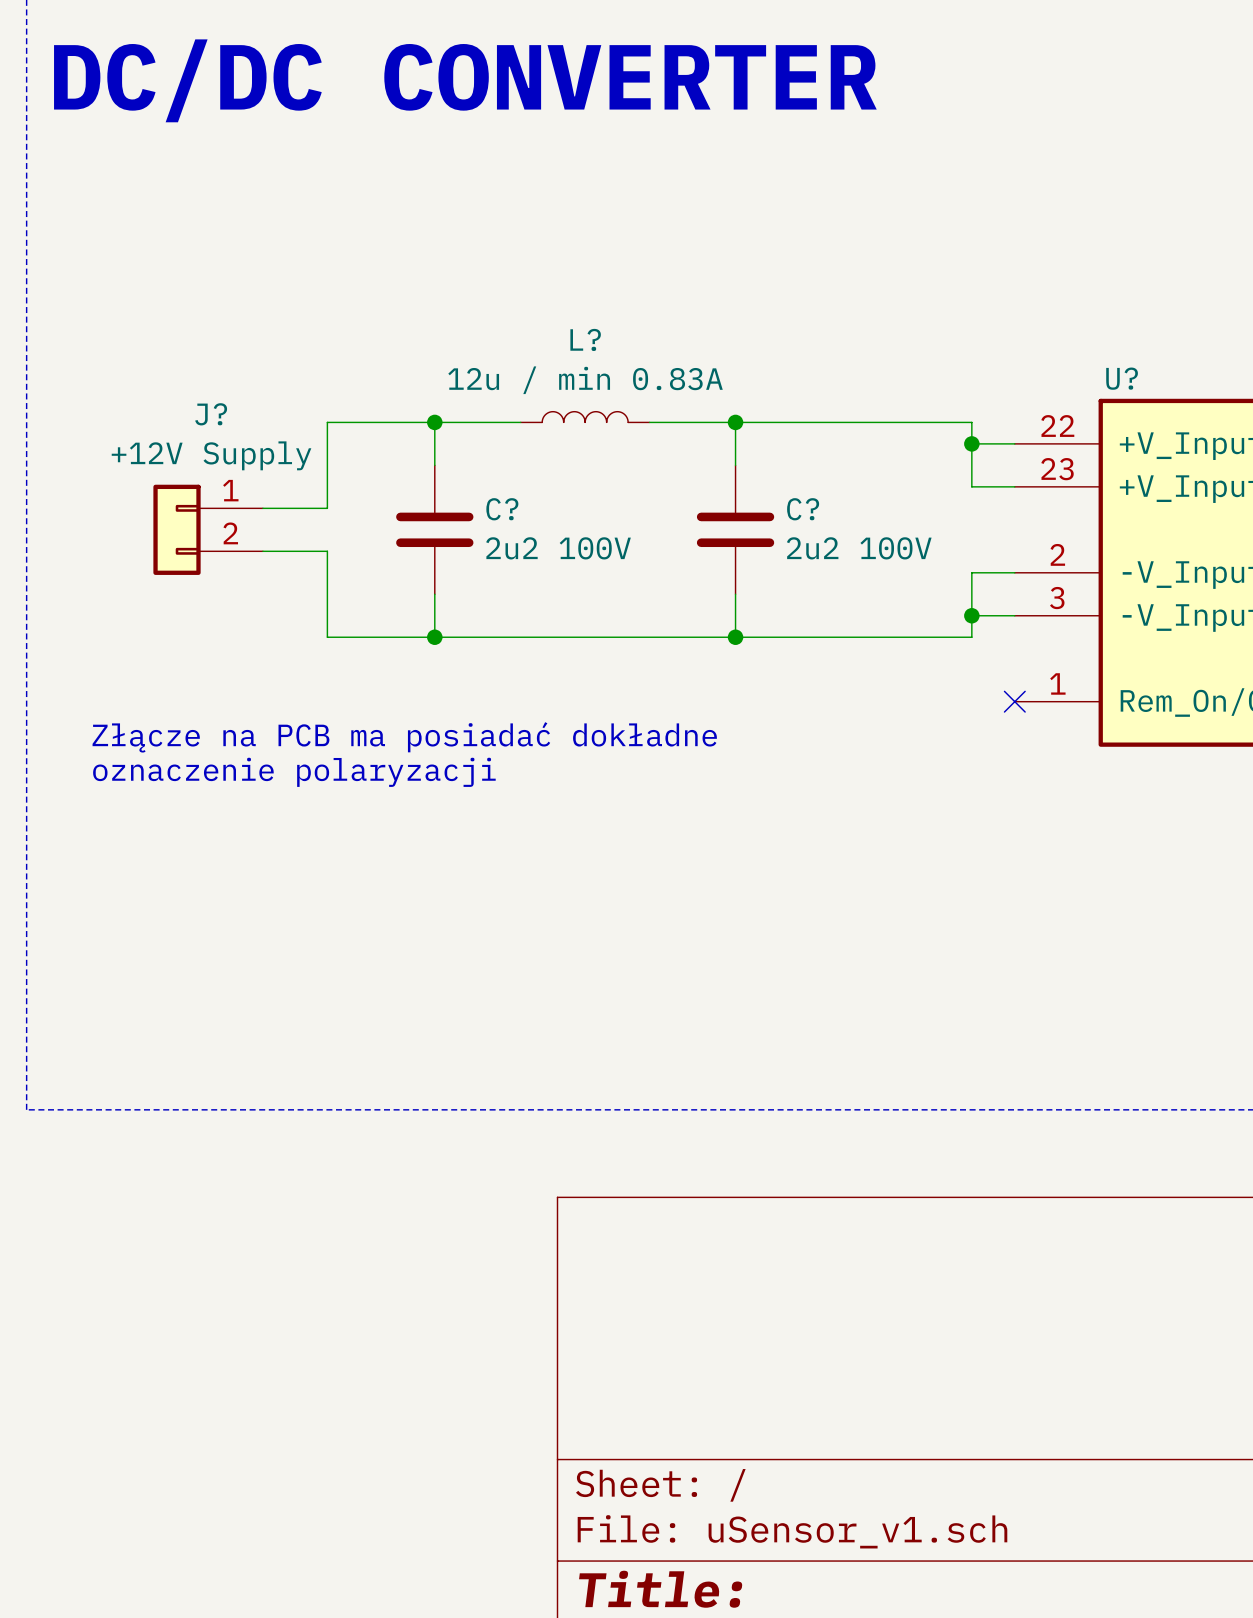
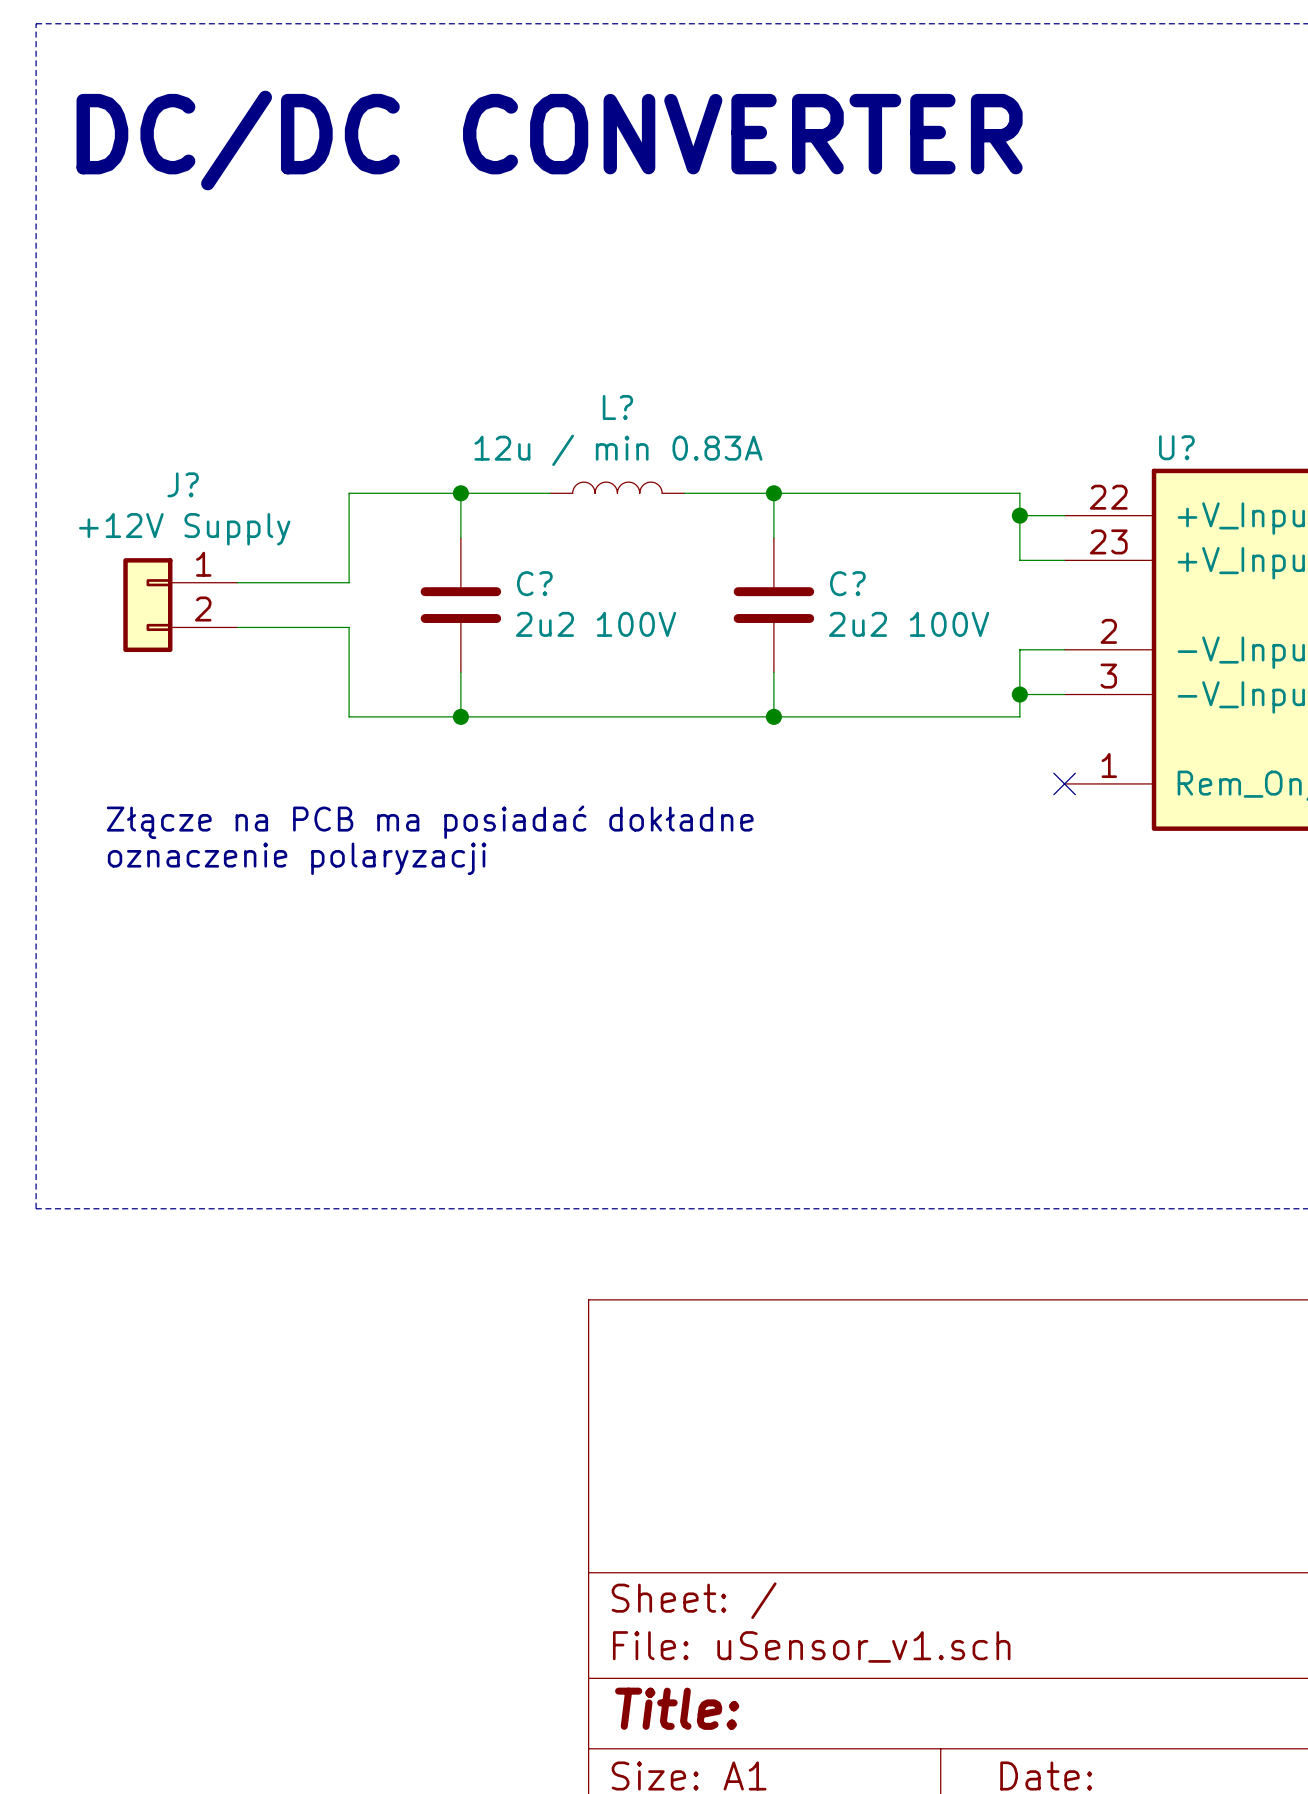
J? position: (208, 529) -> (180, 605)

